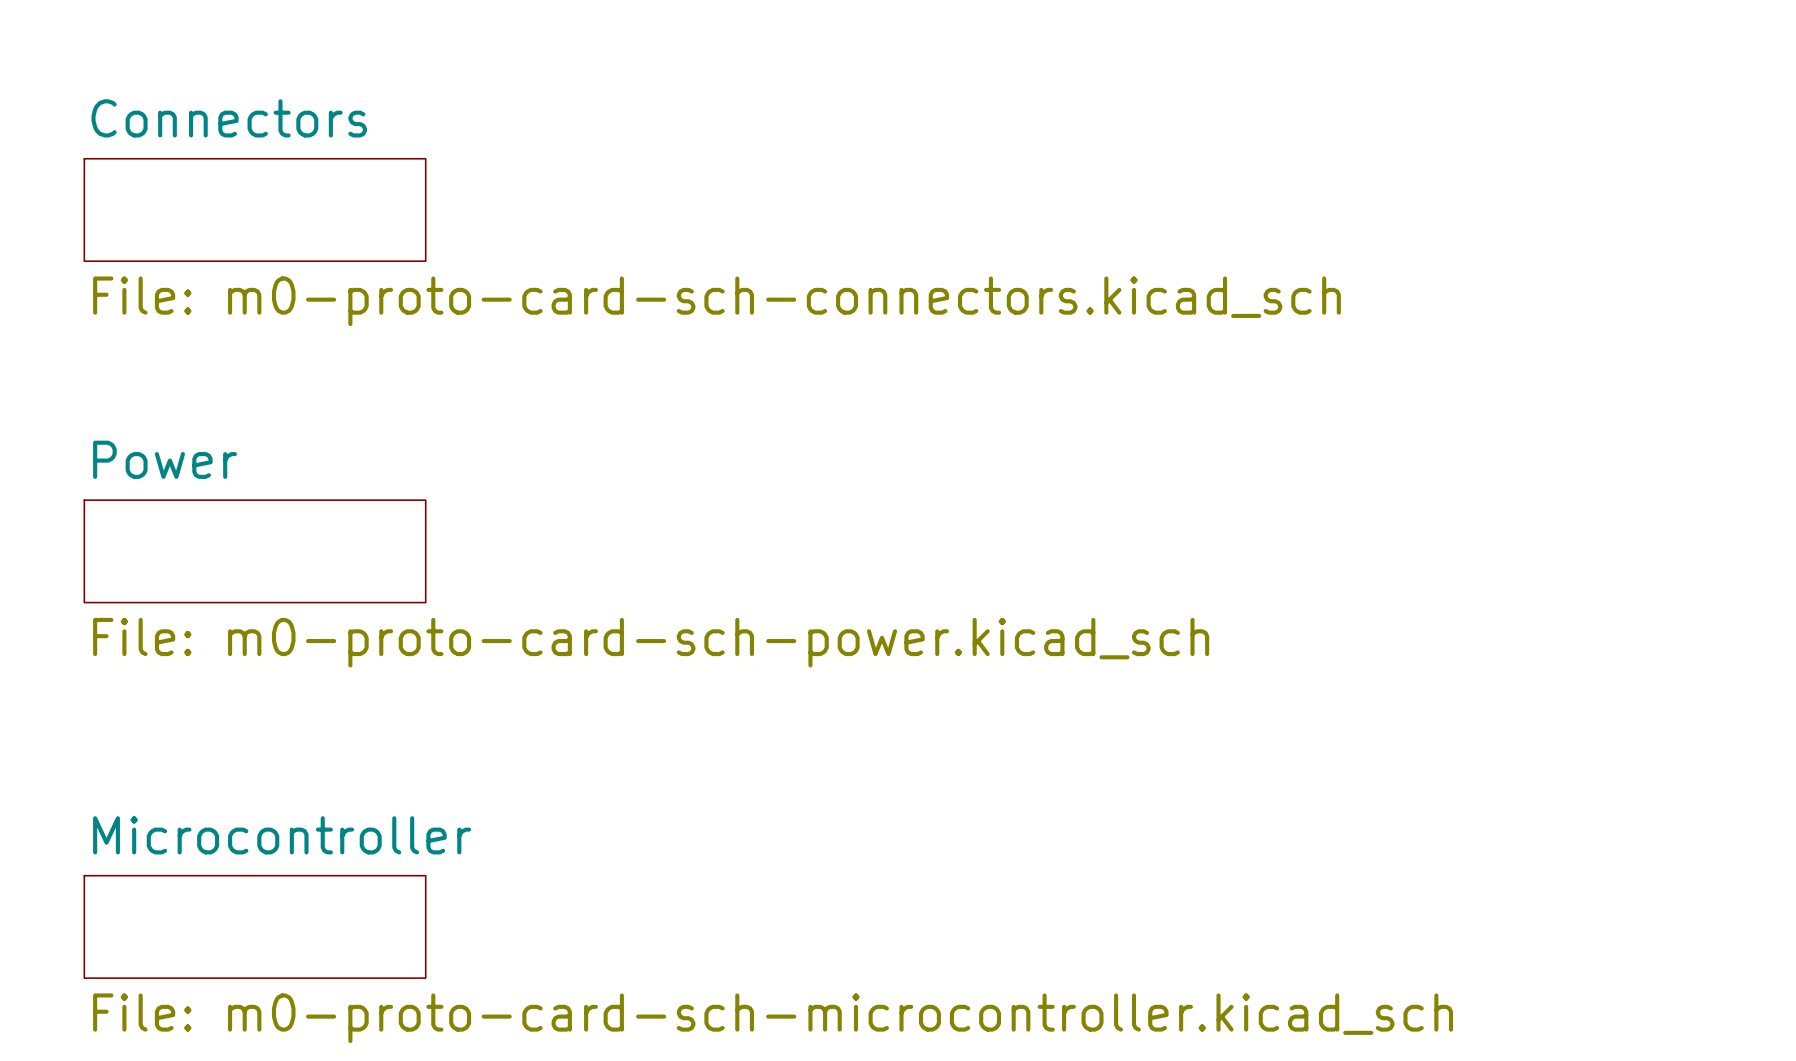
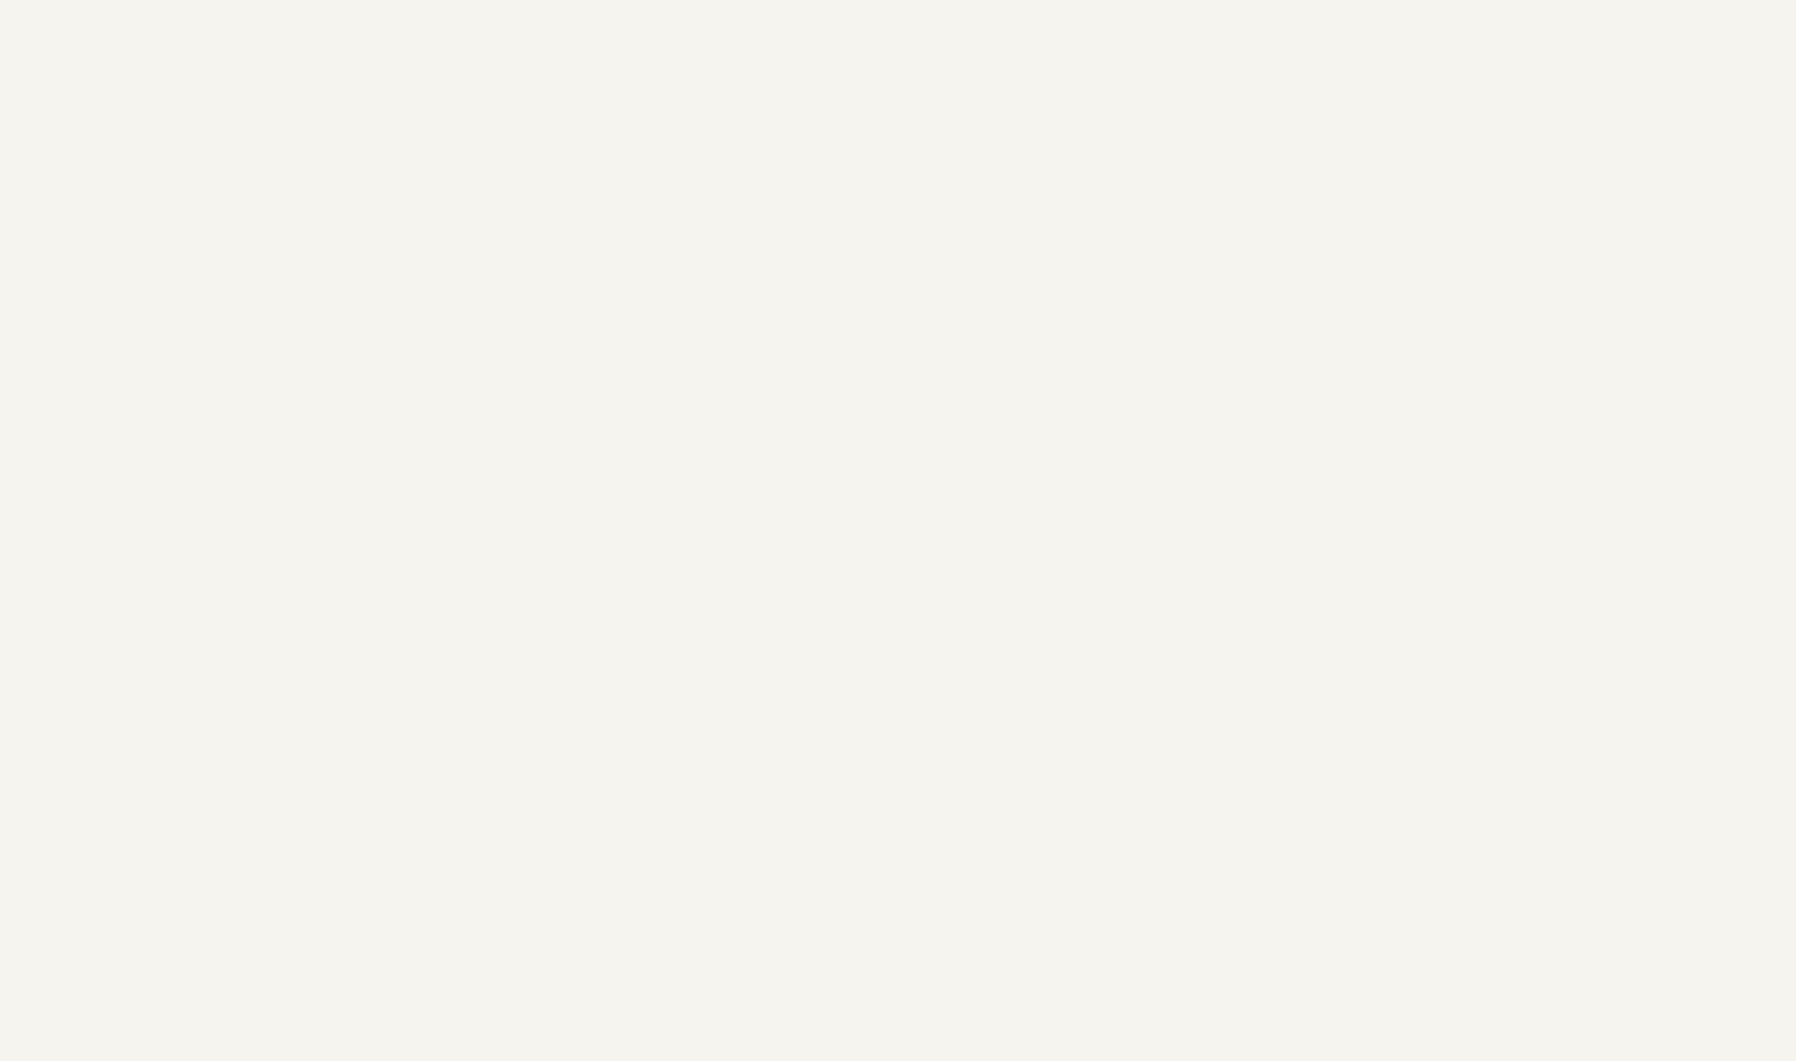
sheet Connectors: File: m0-proto-card-sch-connectors.kicad_sch (255, 209) -> none
sheet Power: File: m0-proto-card-sch-power.kicad_sch (255, 551) -> none
sheet Microcontroller: File: m0-proto-card-sch-microcontroller.kicad_sch (255, 926) -> none

